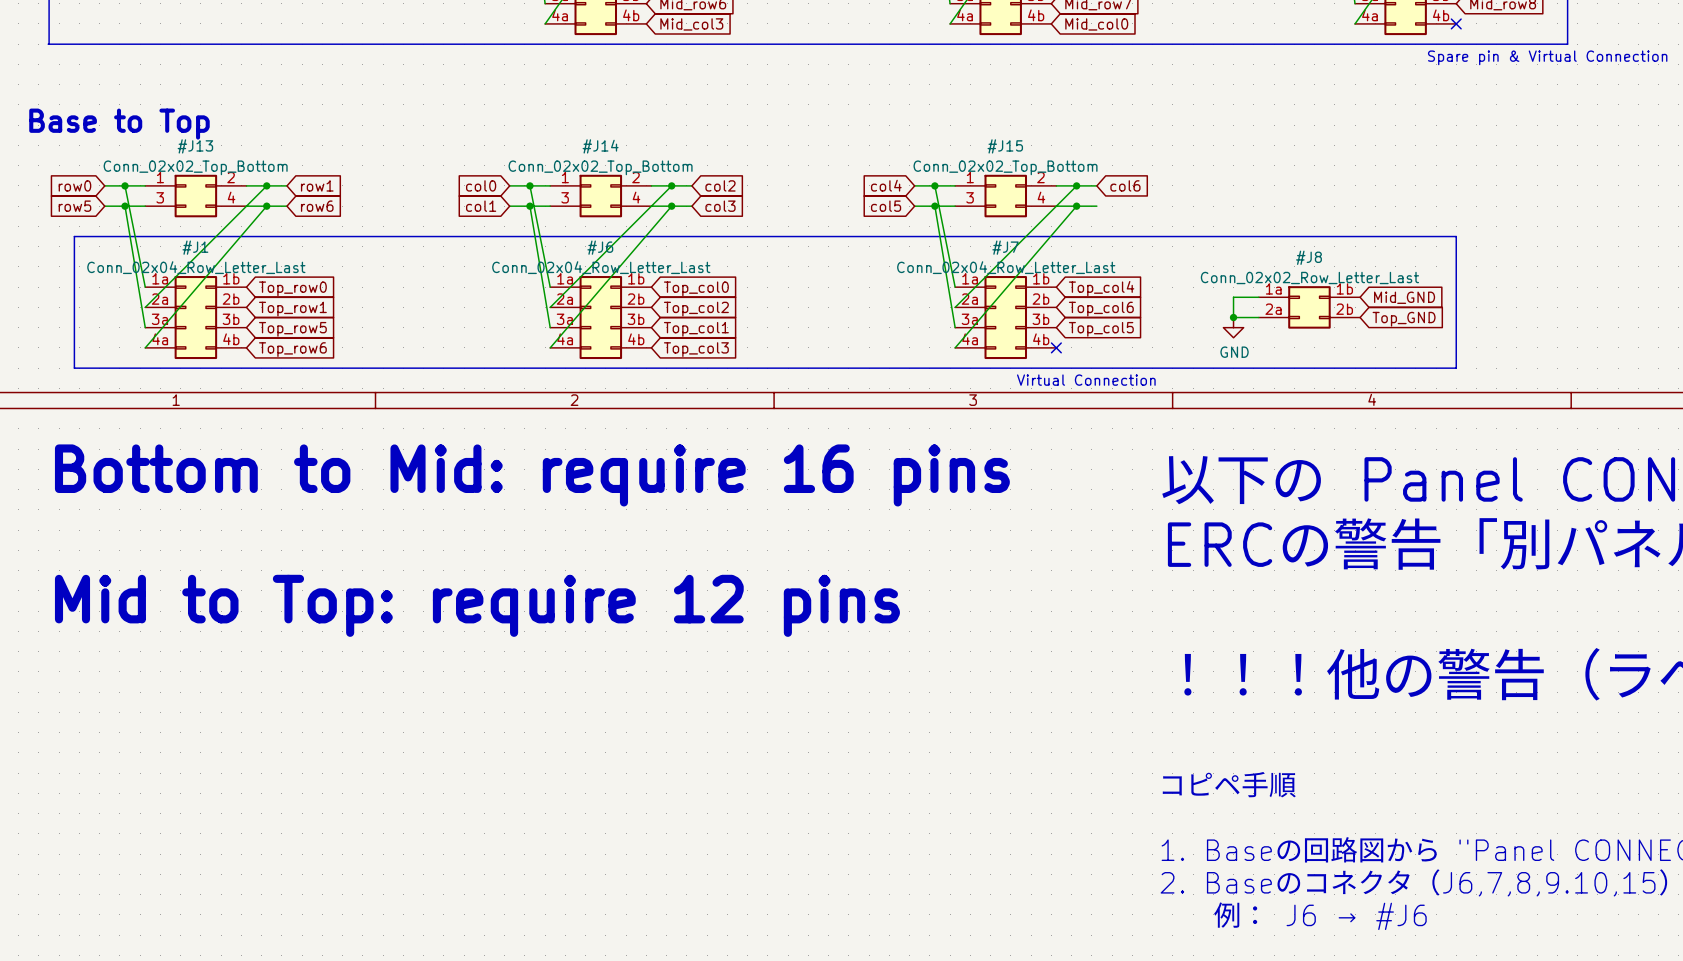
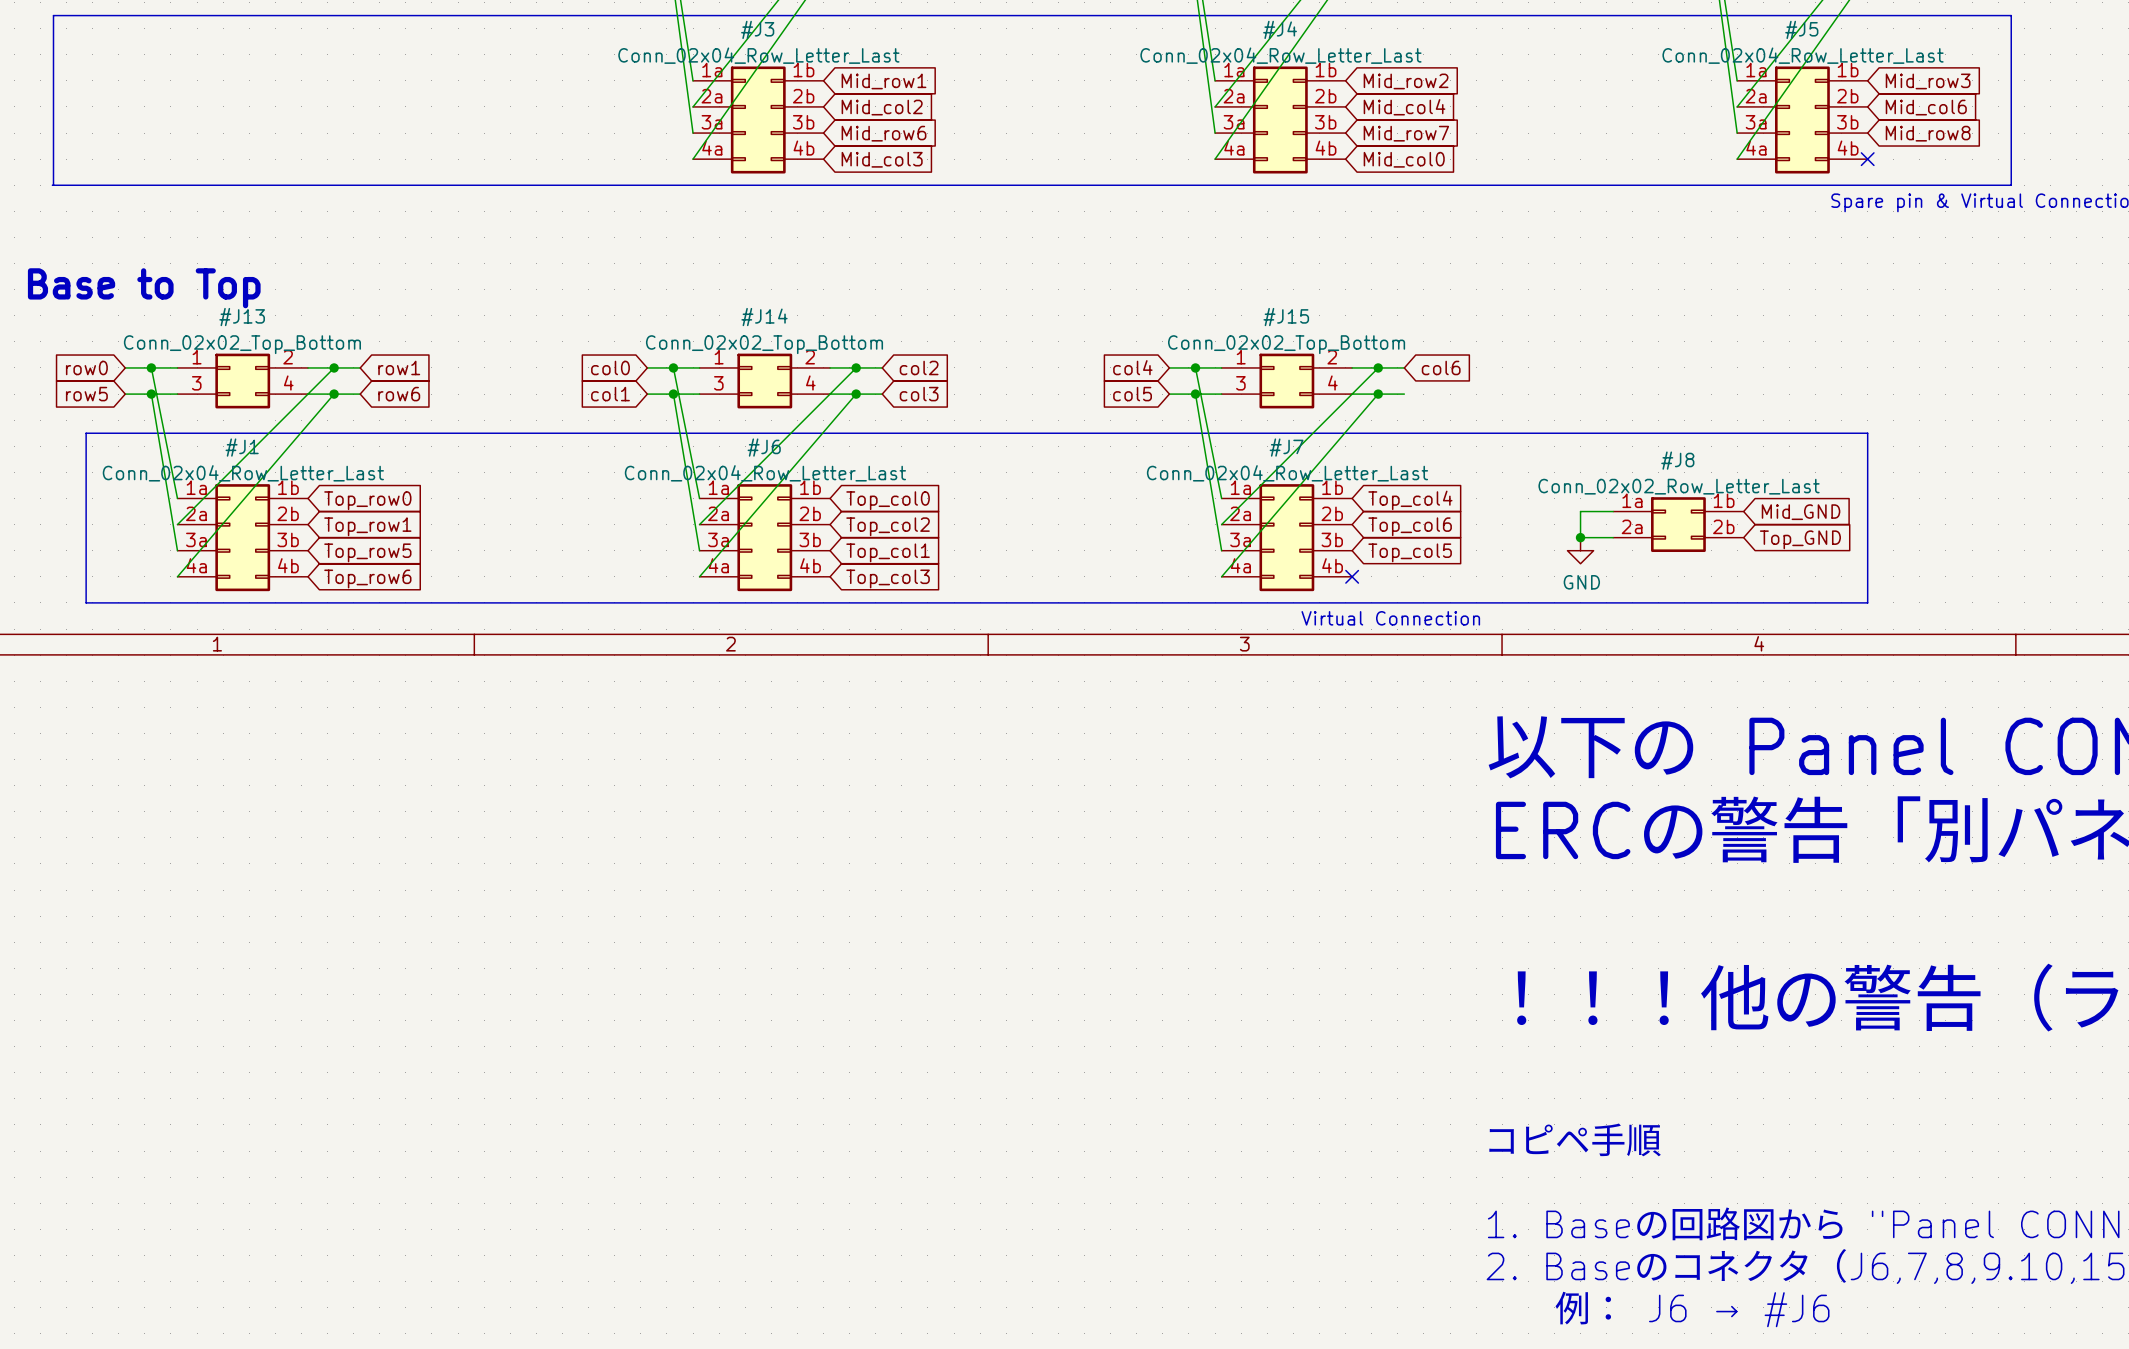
text: Bottom to Mid: require 16 pins (532, 475) -> none
text: Mid to Top: require 12 pins (477, 605) -> none

